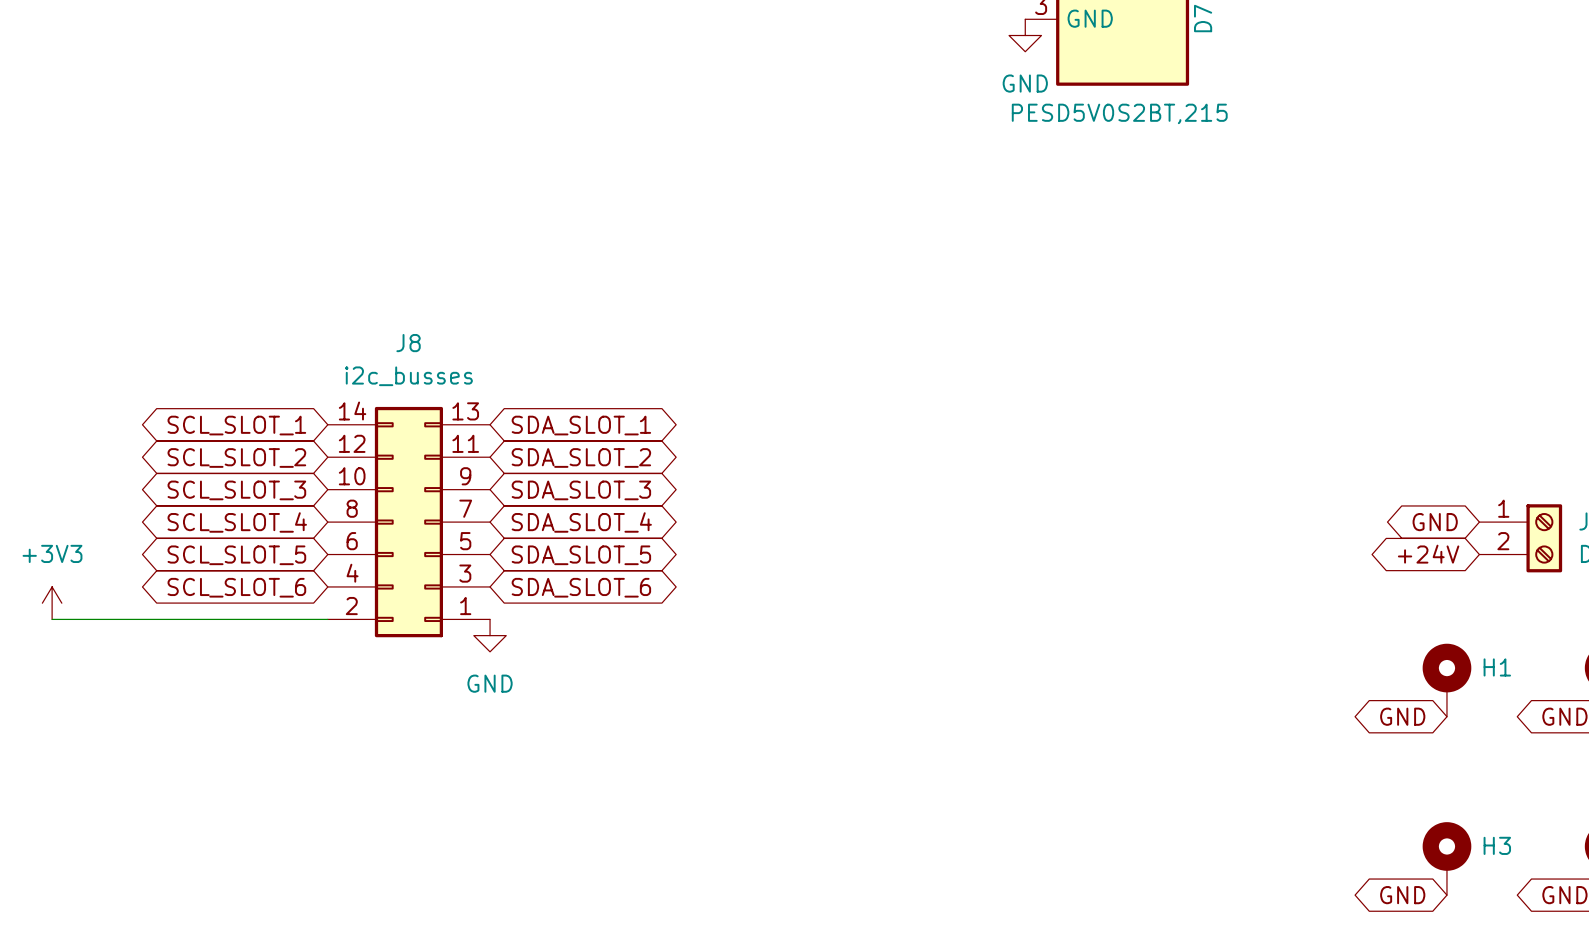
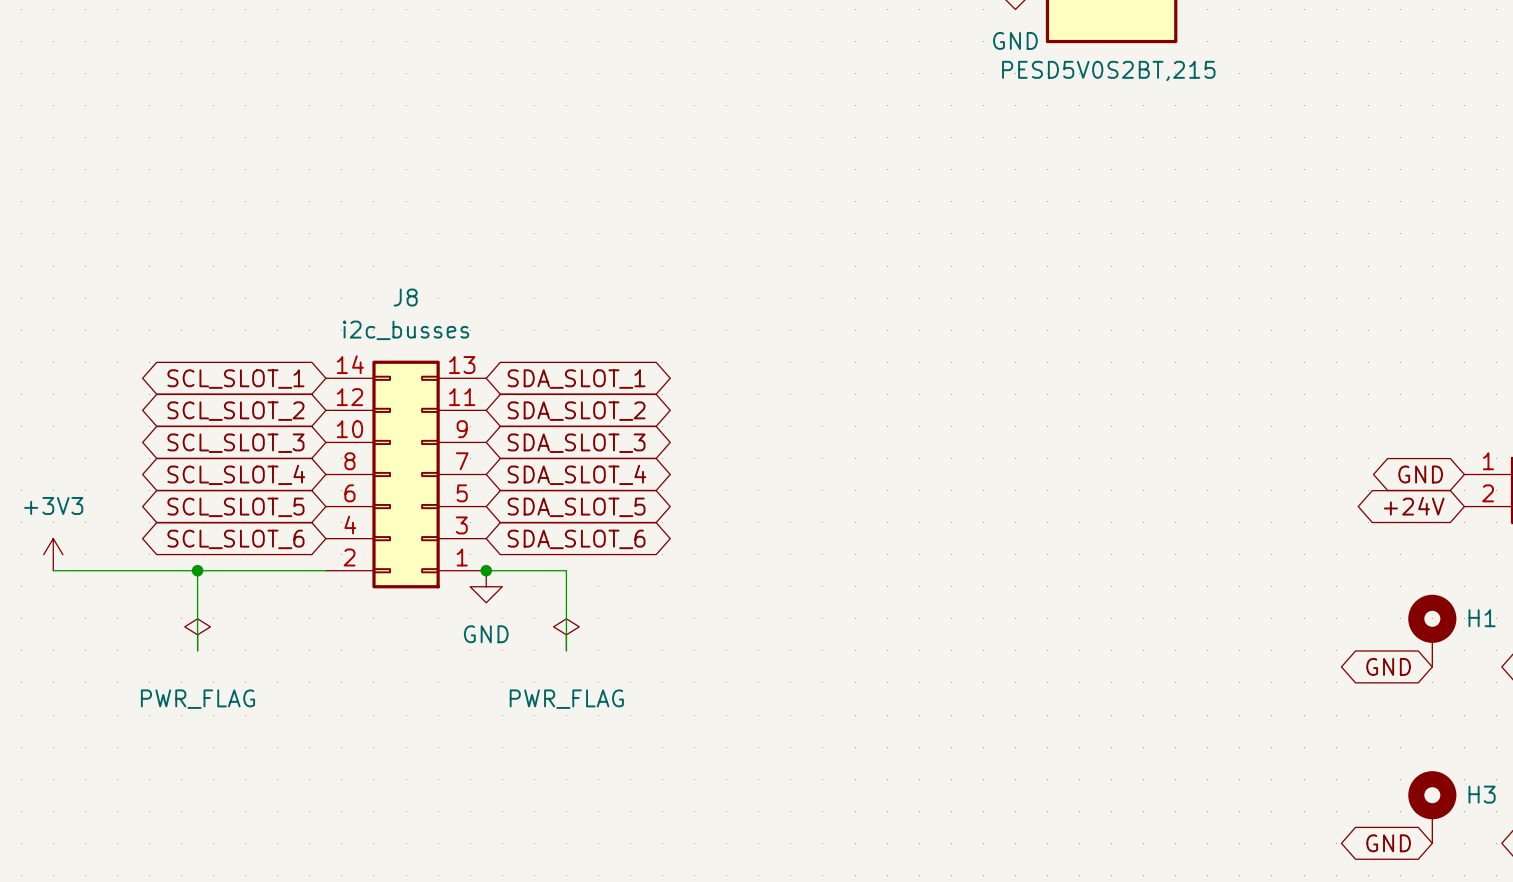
wire: none -> (197, 570) (197, 650)
junction: none -> (197, 570)
wire: none -> (486, 570) (566, 570) (566, 650)
junction: none -> (486, 570)
power symbol: none -> PWR_FLAG (197, 634)
power symbol: none -> PWR_FLAG (566, 634)

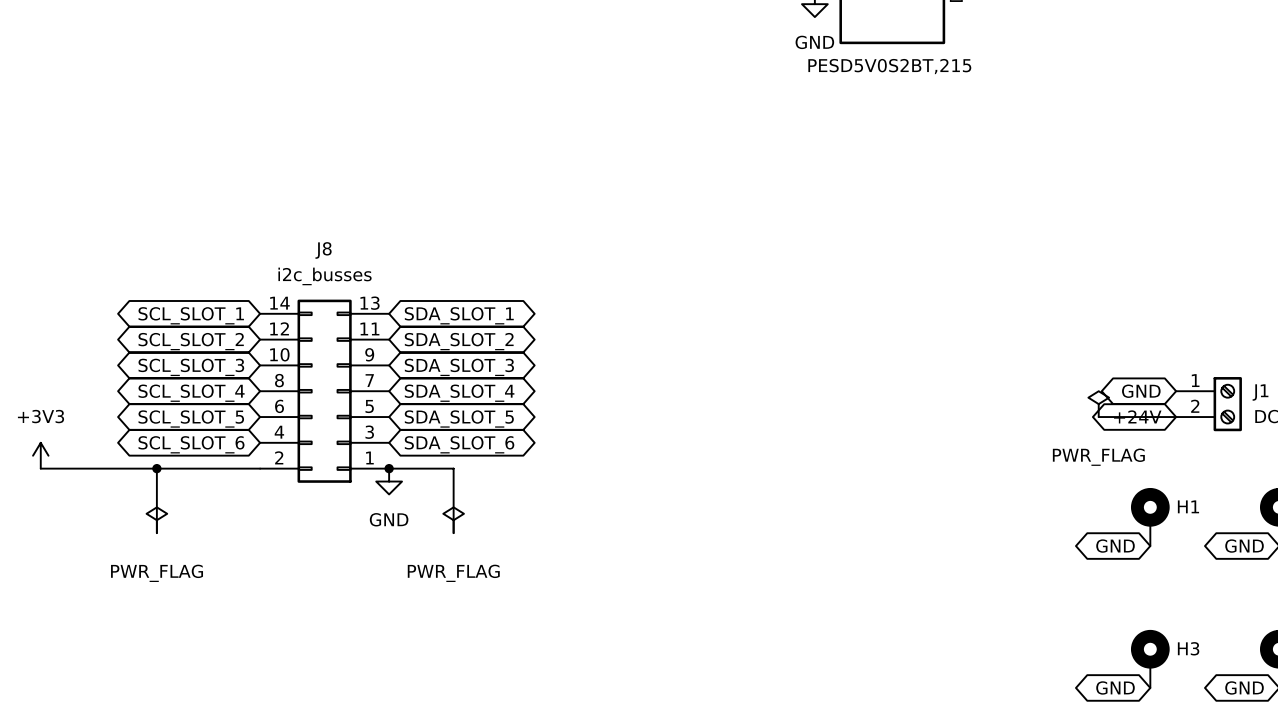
power symbol: none -> PWR_FLAG (1098, 404)
wire: none -> (1098, 417) (1176, 417)

